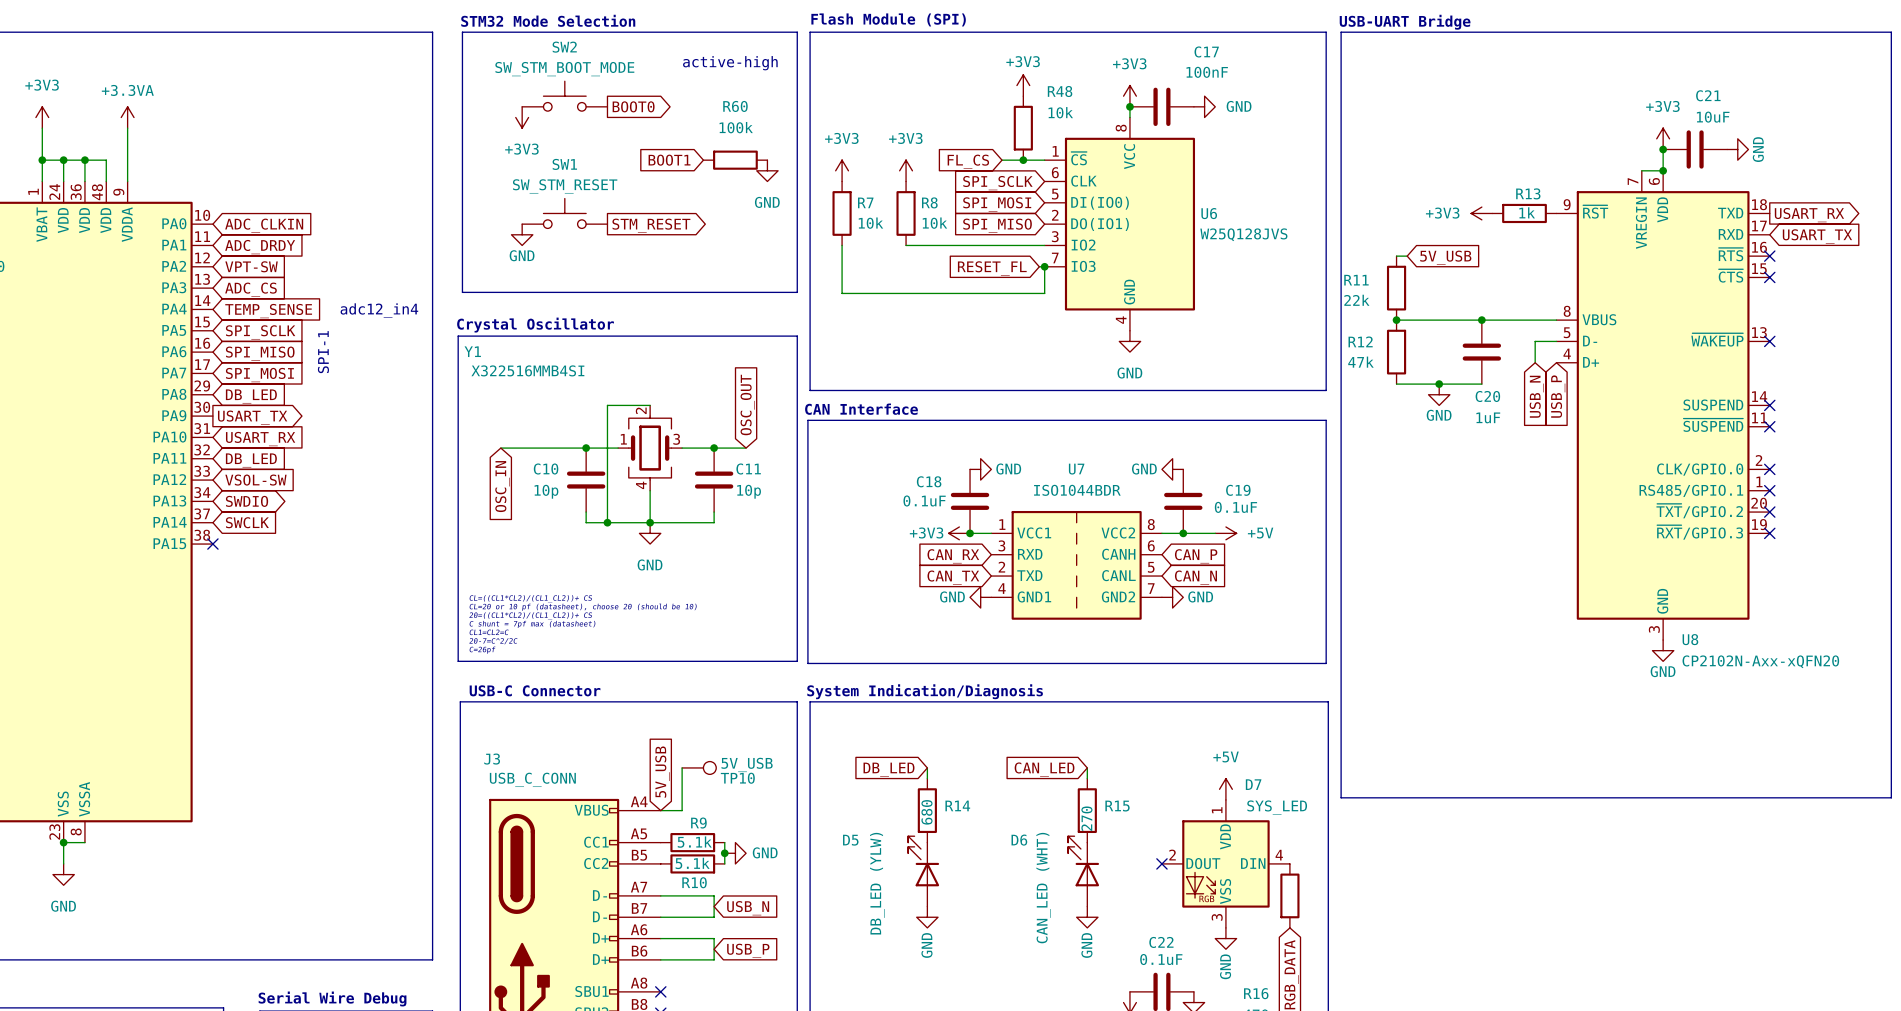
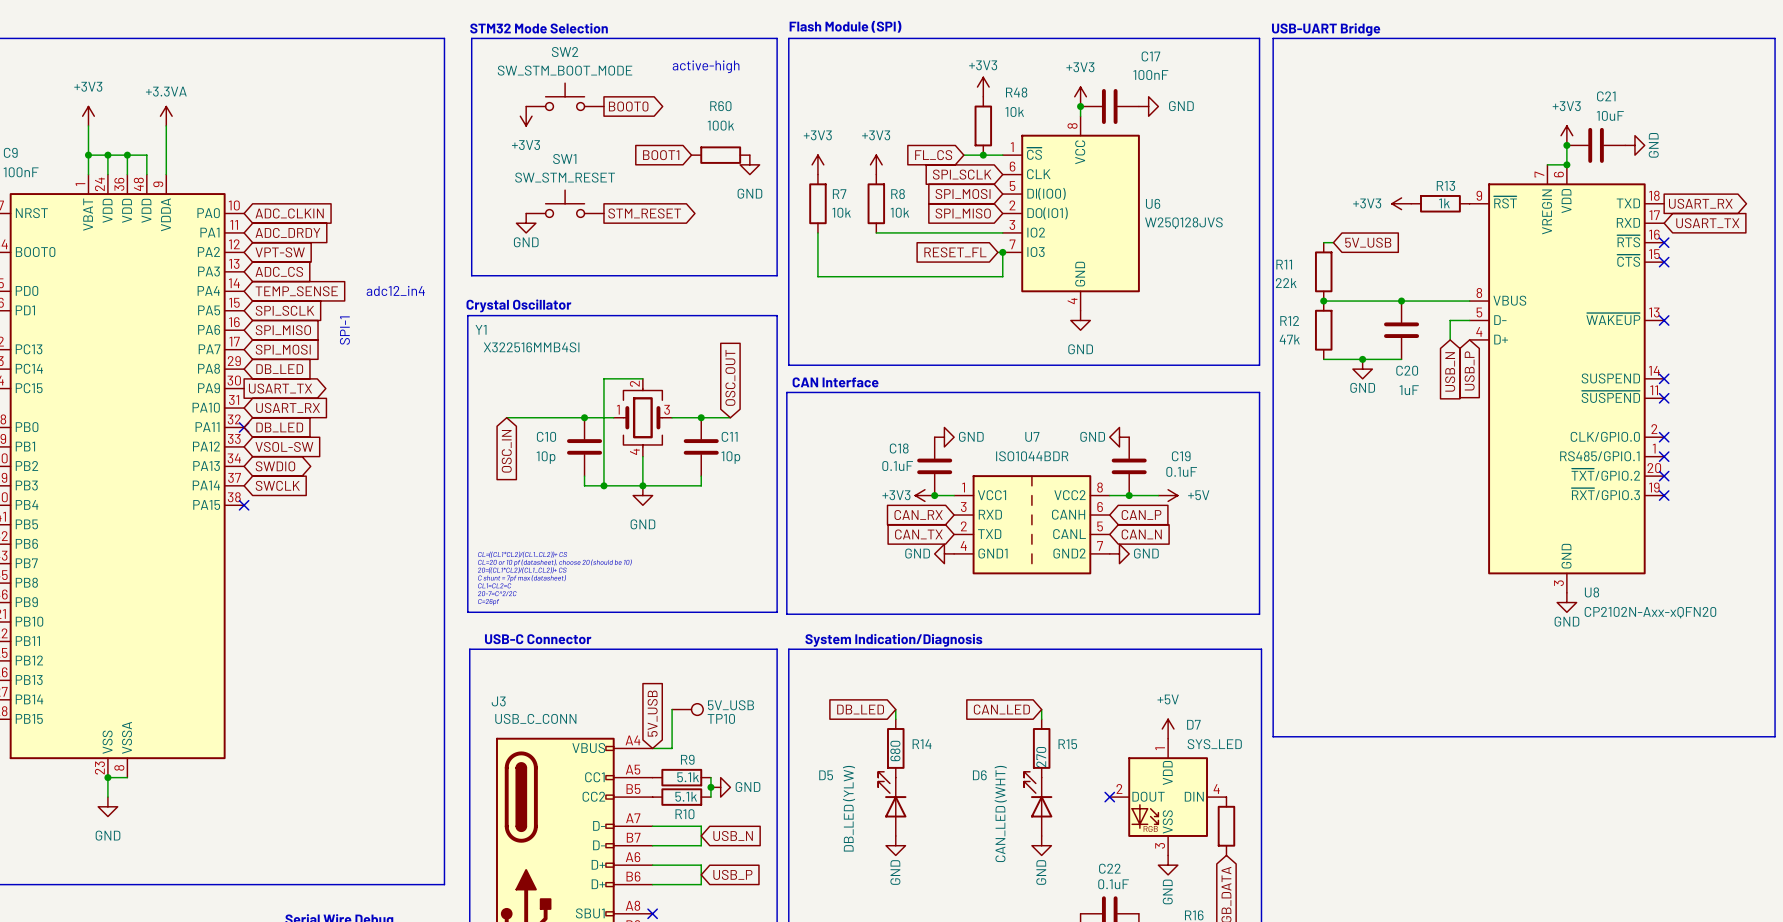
no-connect mark: none -> (244, 427)

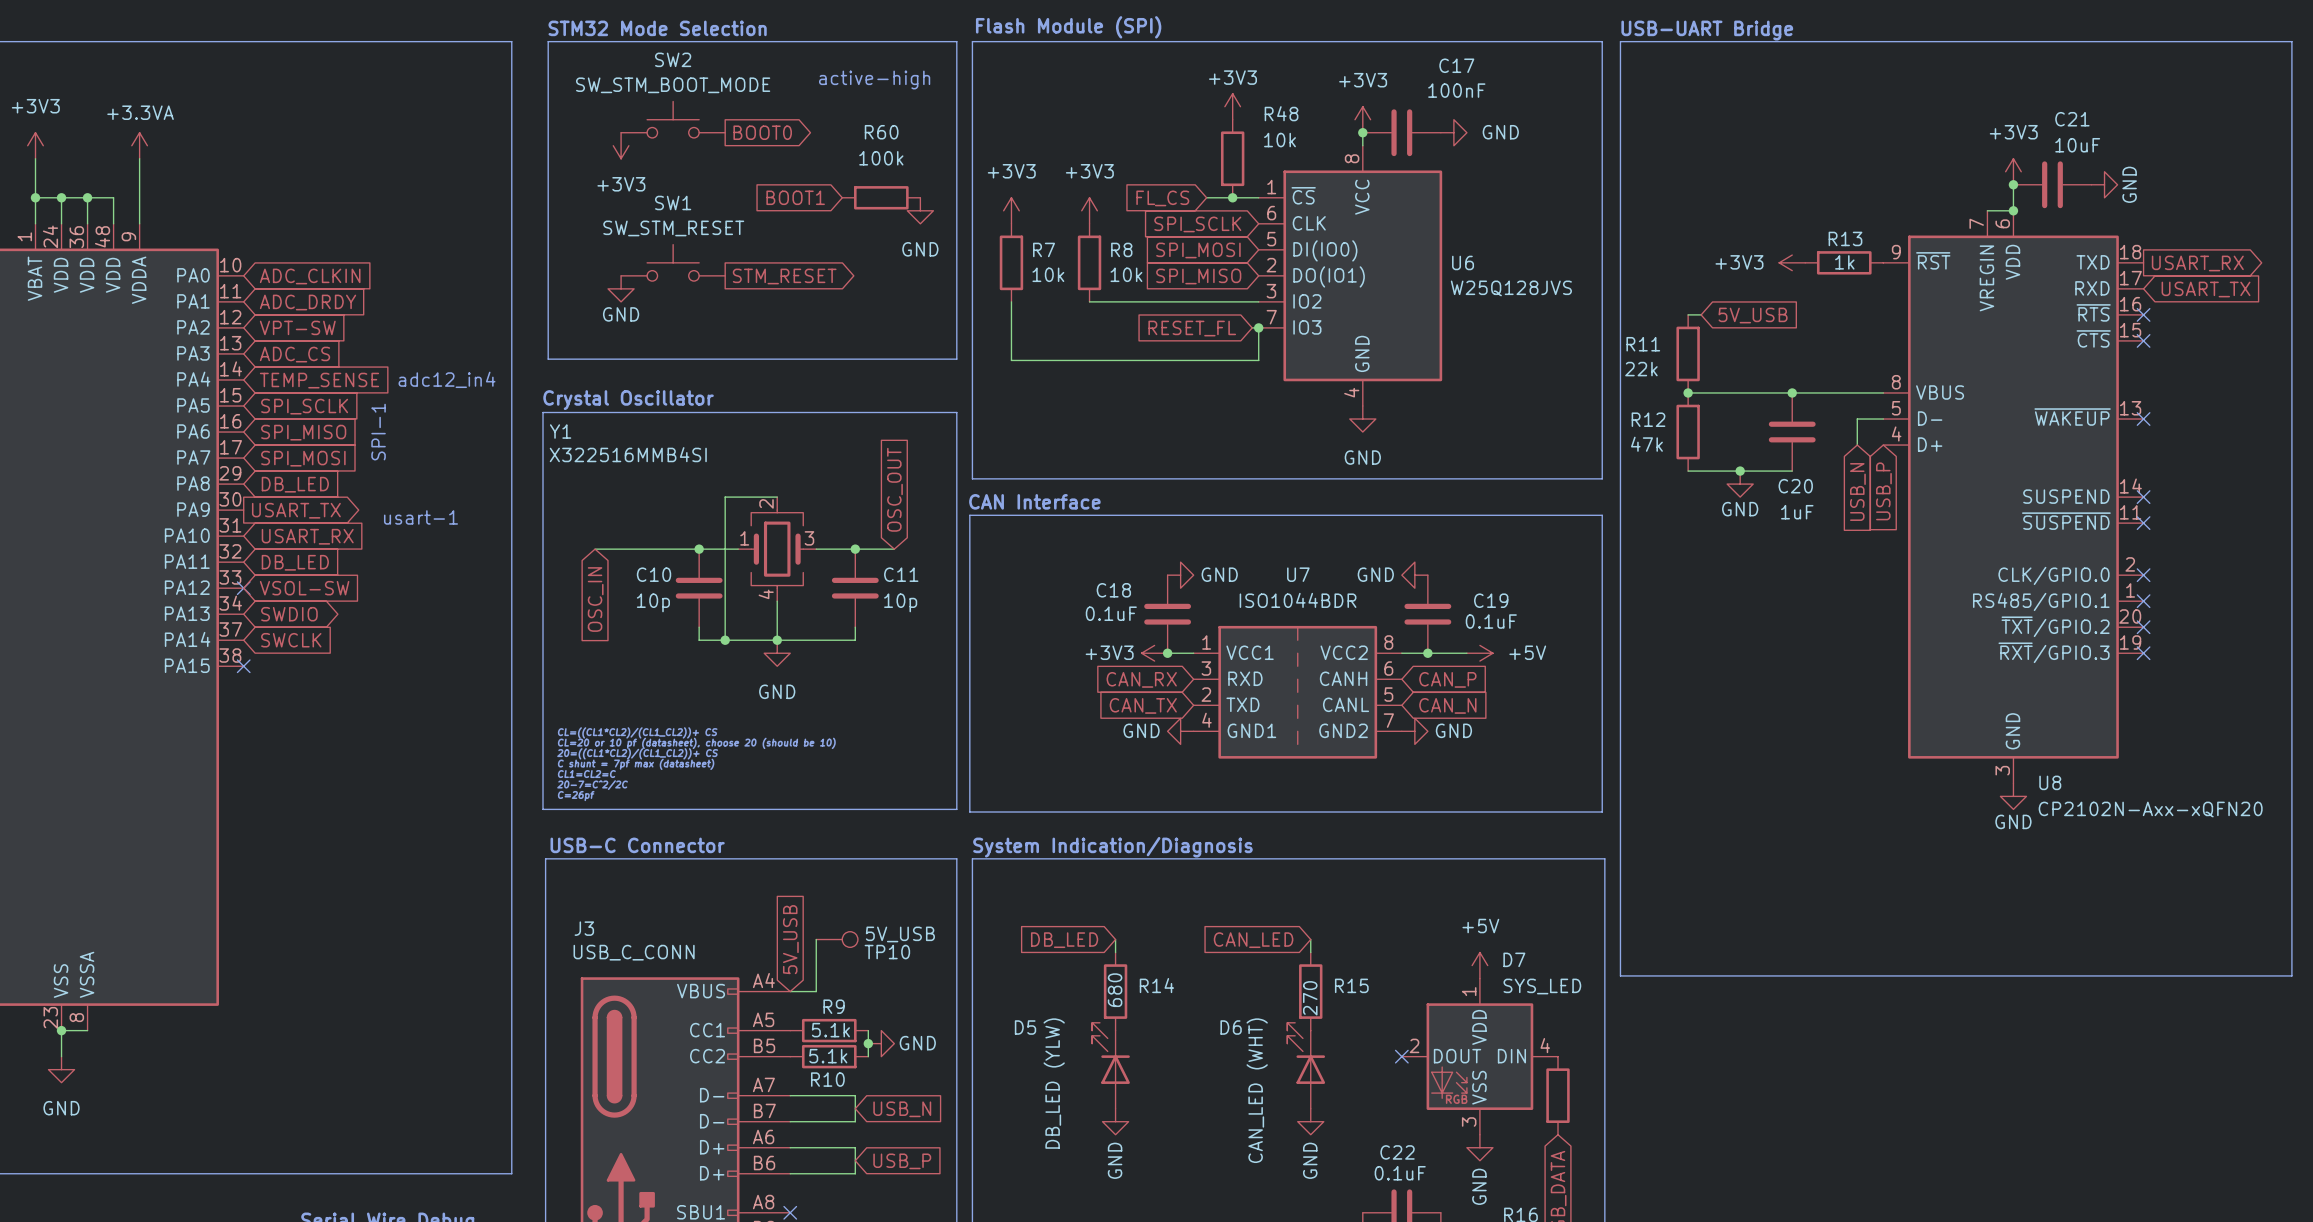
text: none -> usart-1 (420, 517)
no-connect mark position: (244, 427) -> (243, 588)

